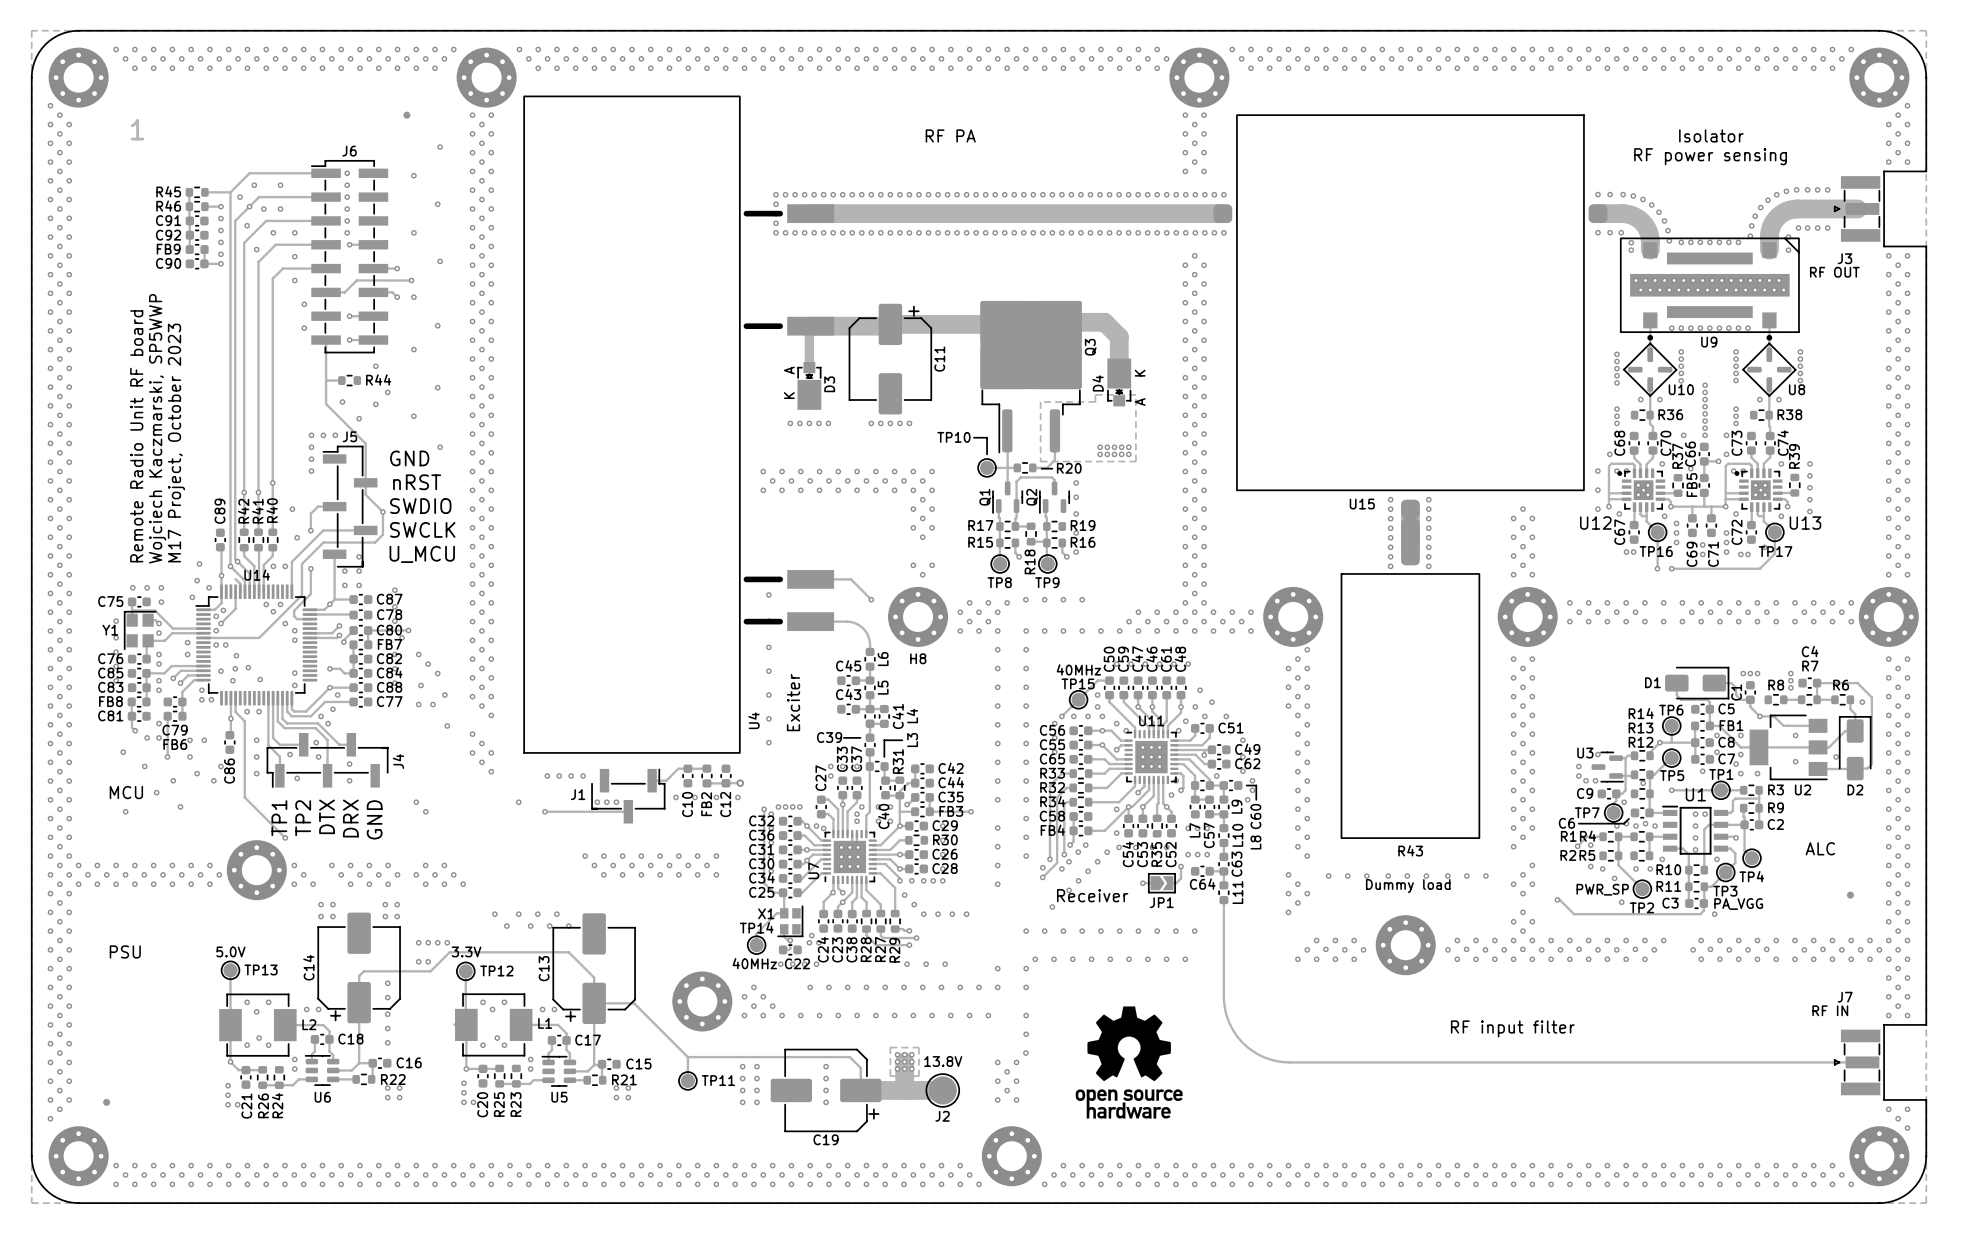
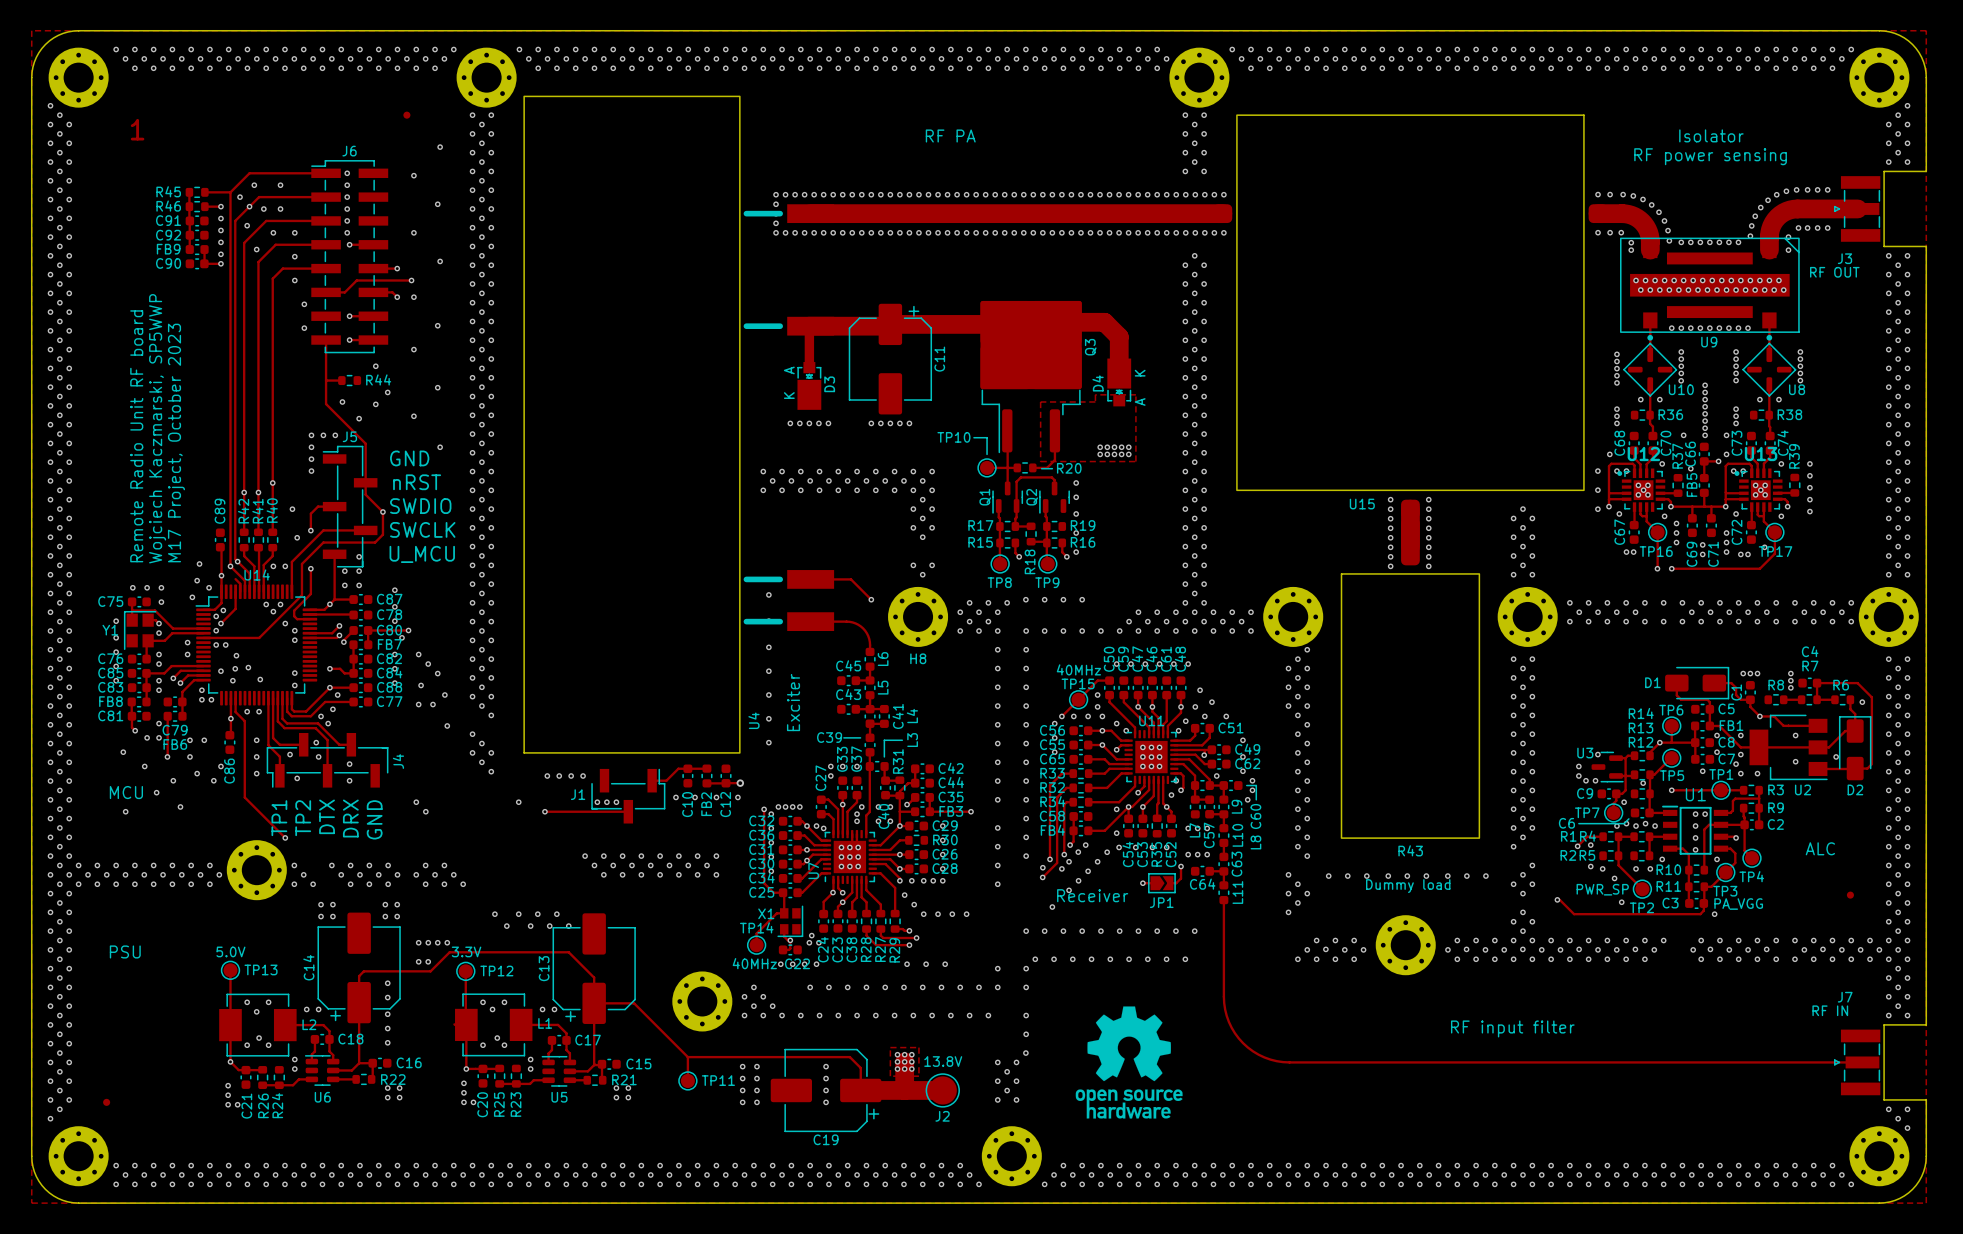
U12 name position: U12 (1595, 523) -> U12 (1643, 453)
U13 name position: U13 (1805, 523) -> U13 (1761, 453)

